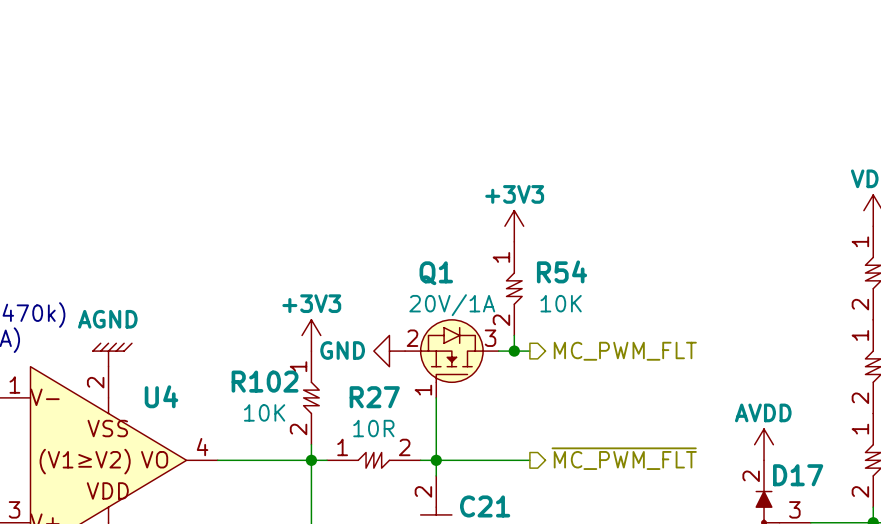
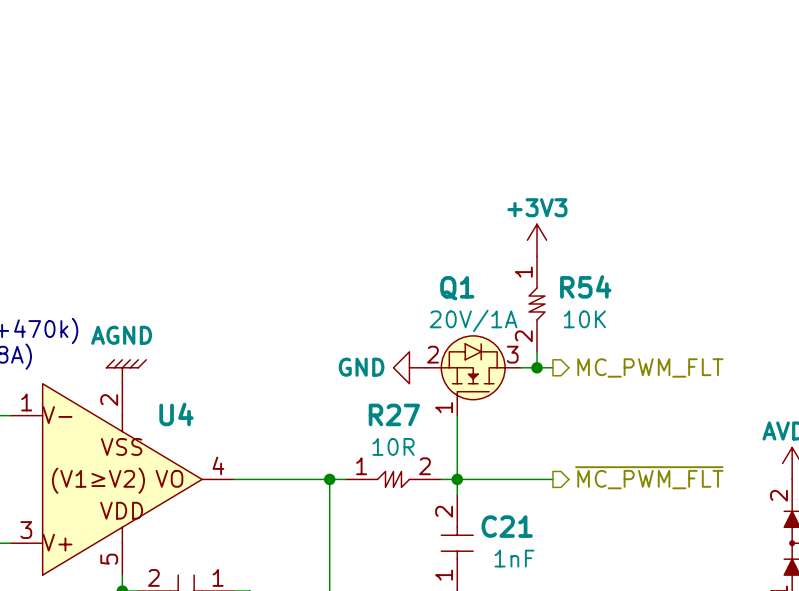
power symbol: +3V3 (311, 335) -> none
R102: 10K (311, 397) -> none
wire: (311, 444) (311, 460) -> none

